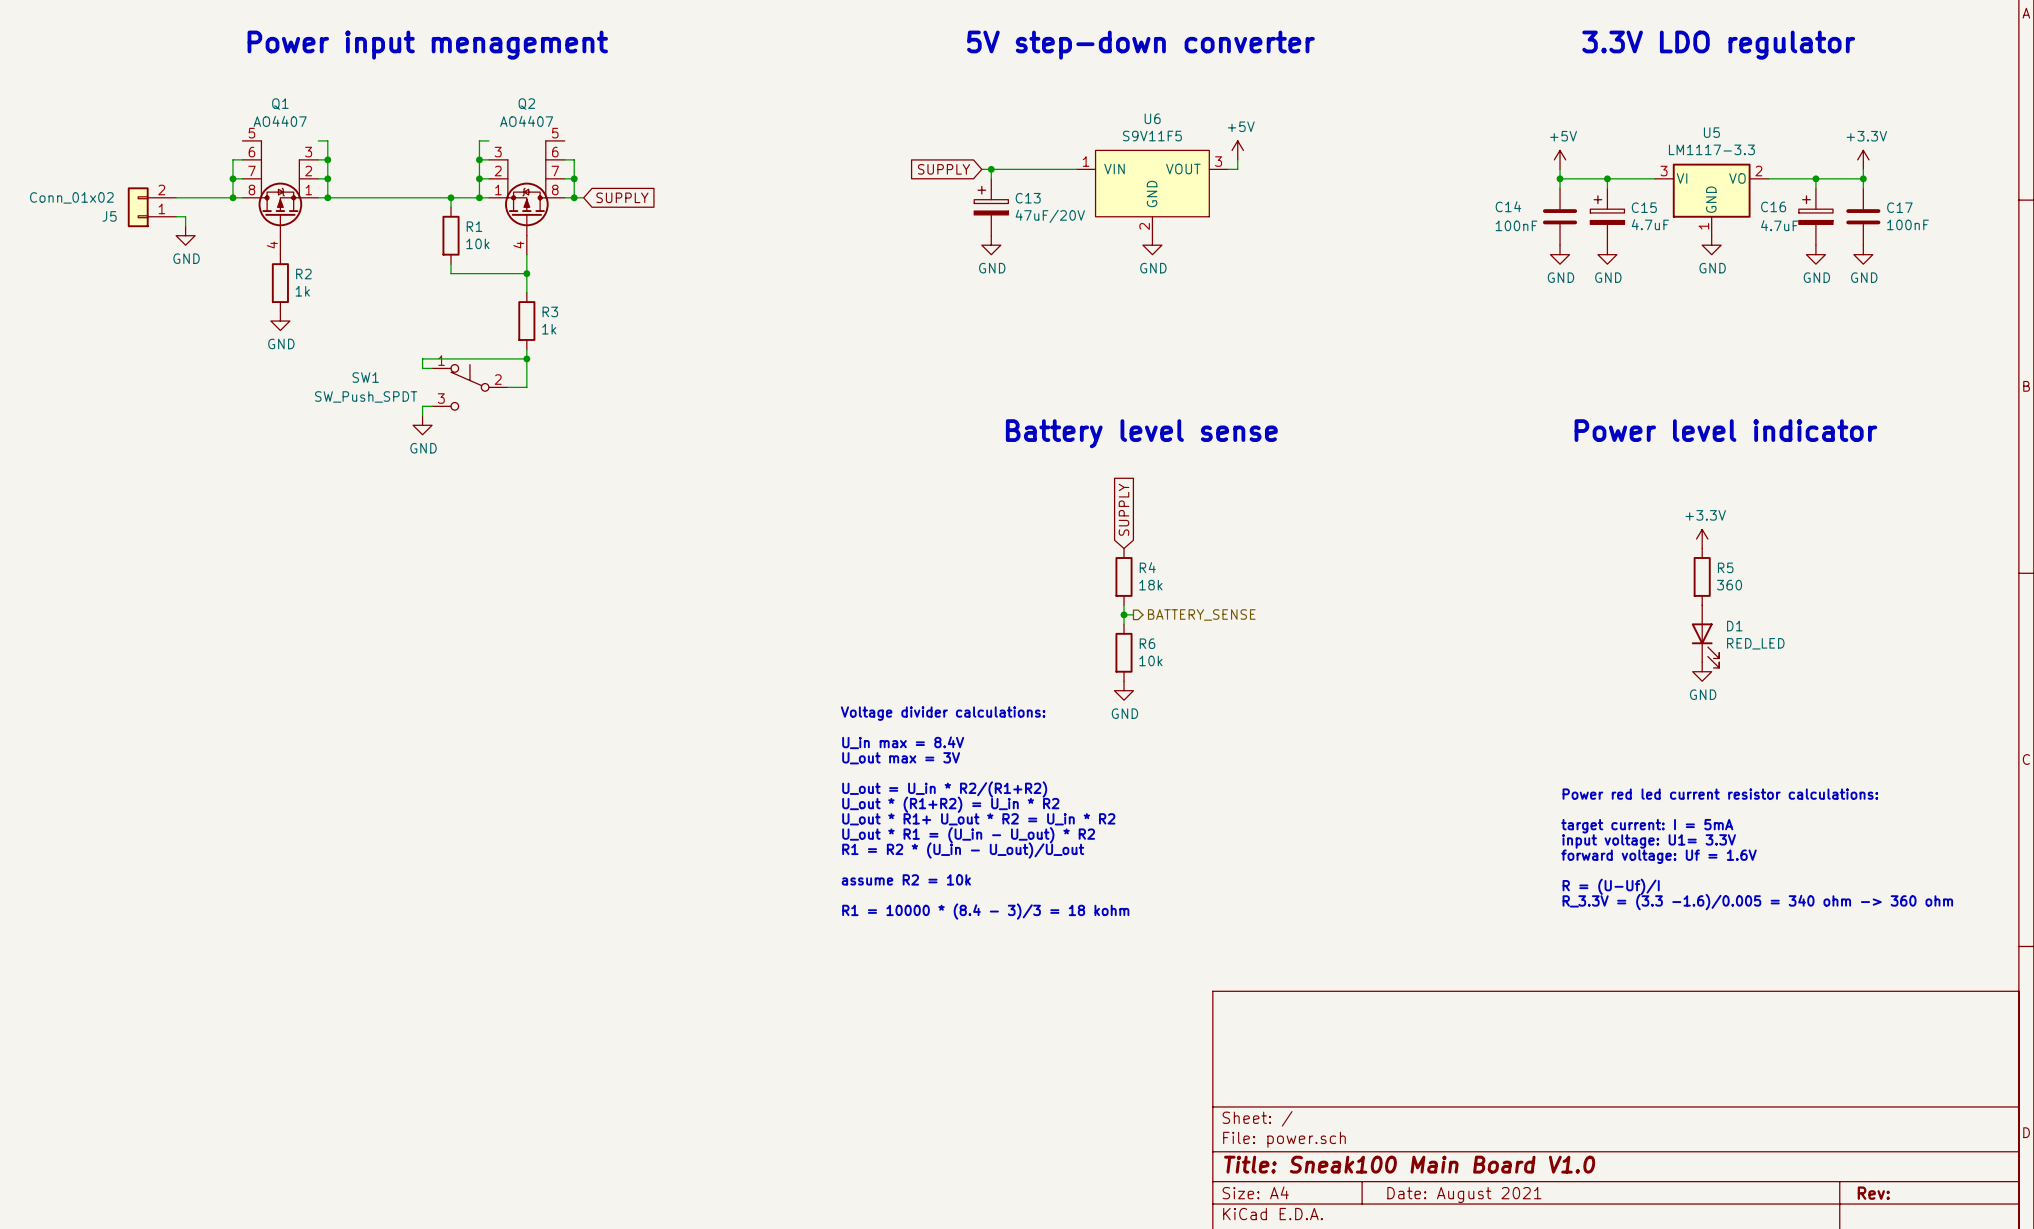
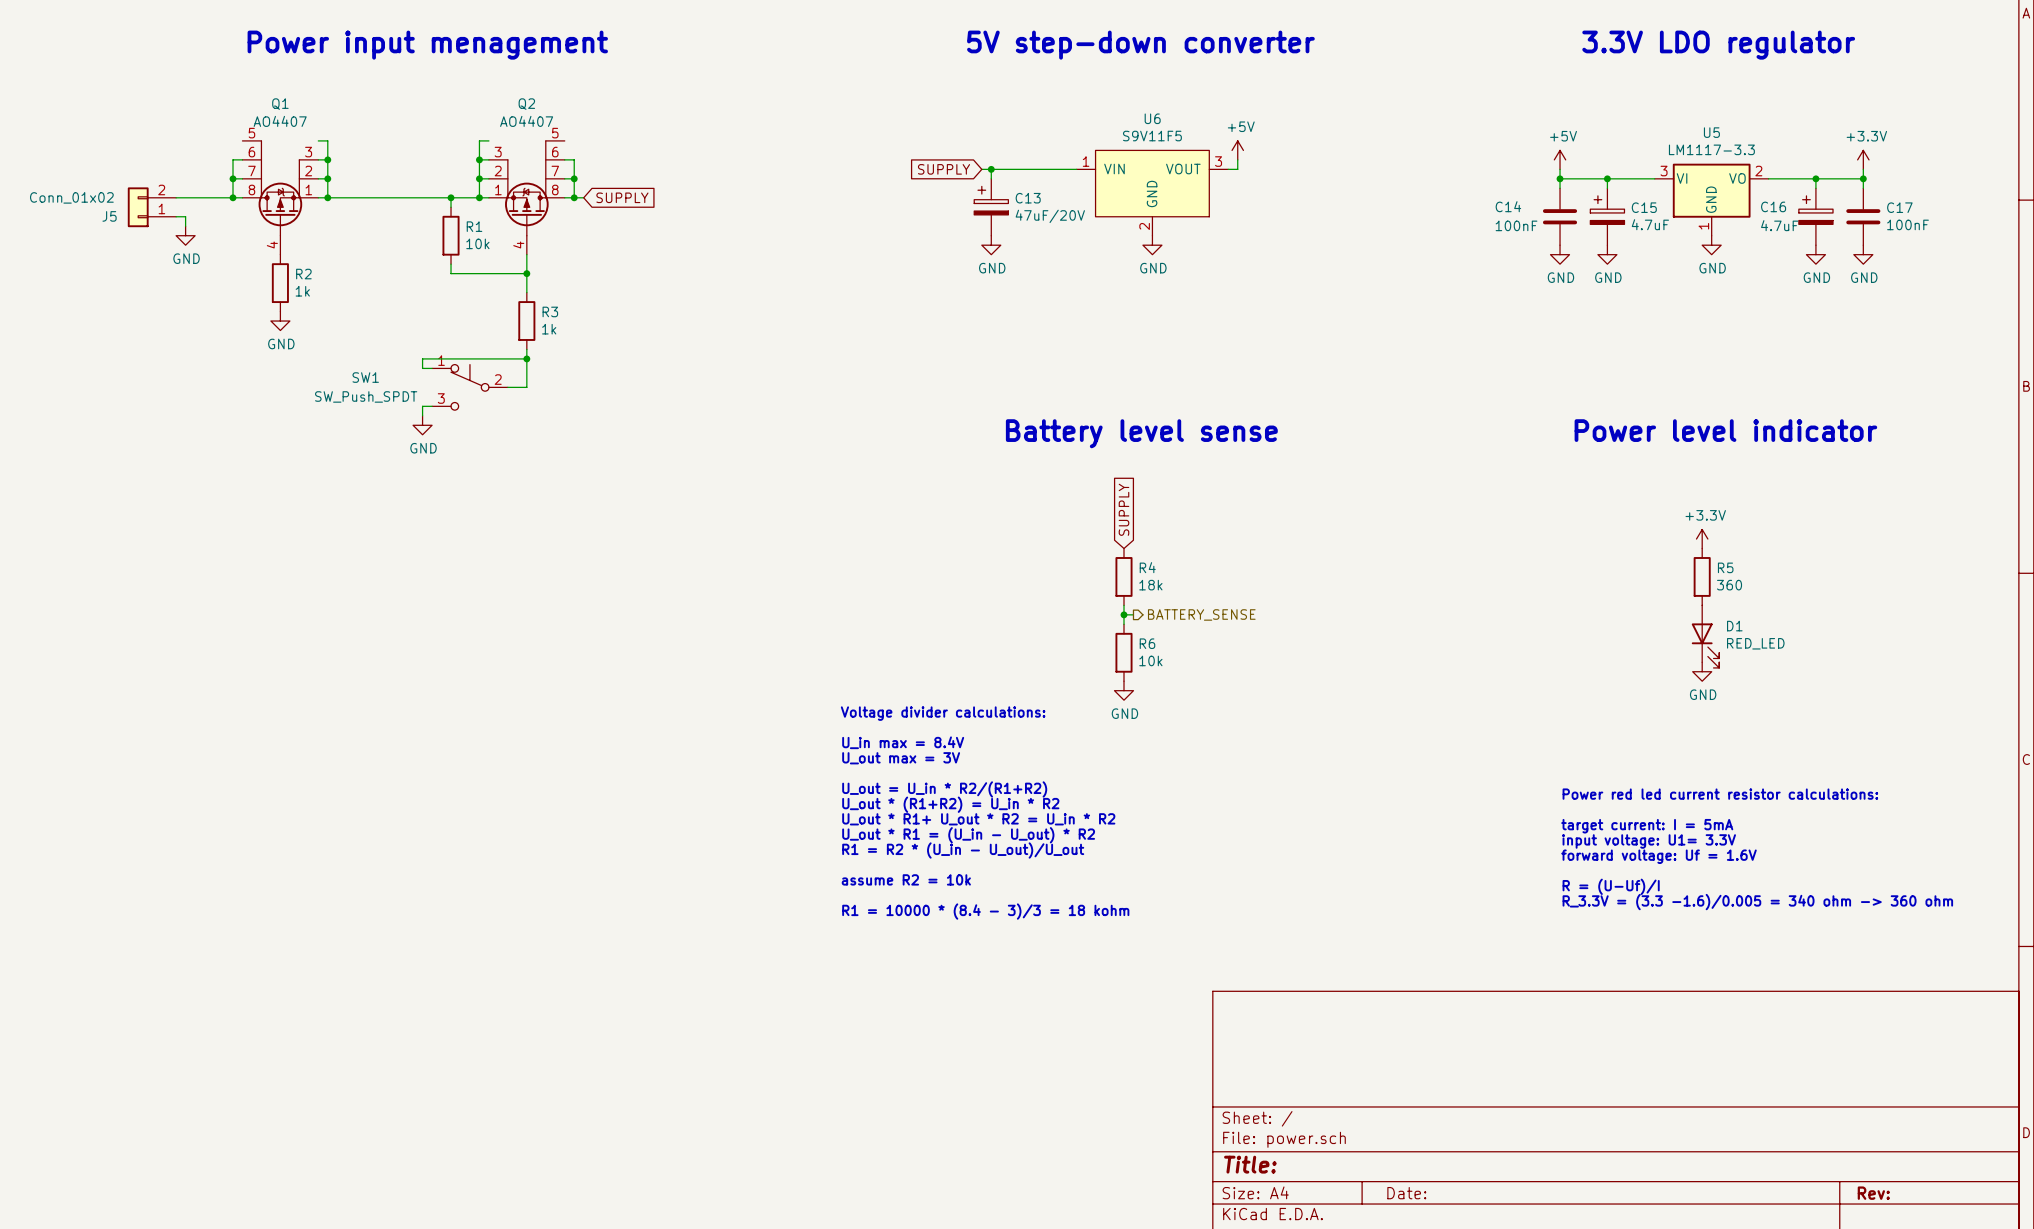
title block: Title: Sneak100 Main Board V1.0 (1409, 1164) -> Title: (1250, 1164)
title block: Date: August 2021 (1464, 1195) -> Date: (1406, 1193)

